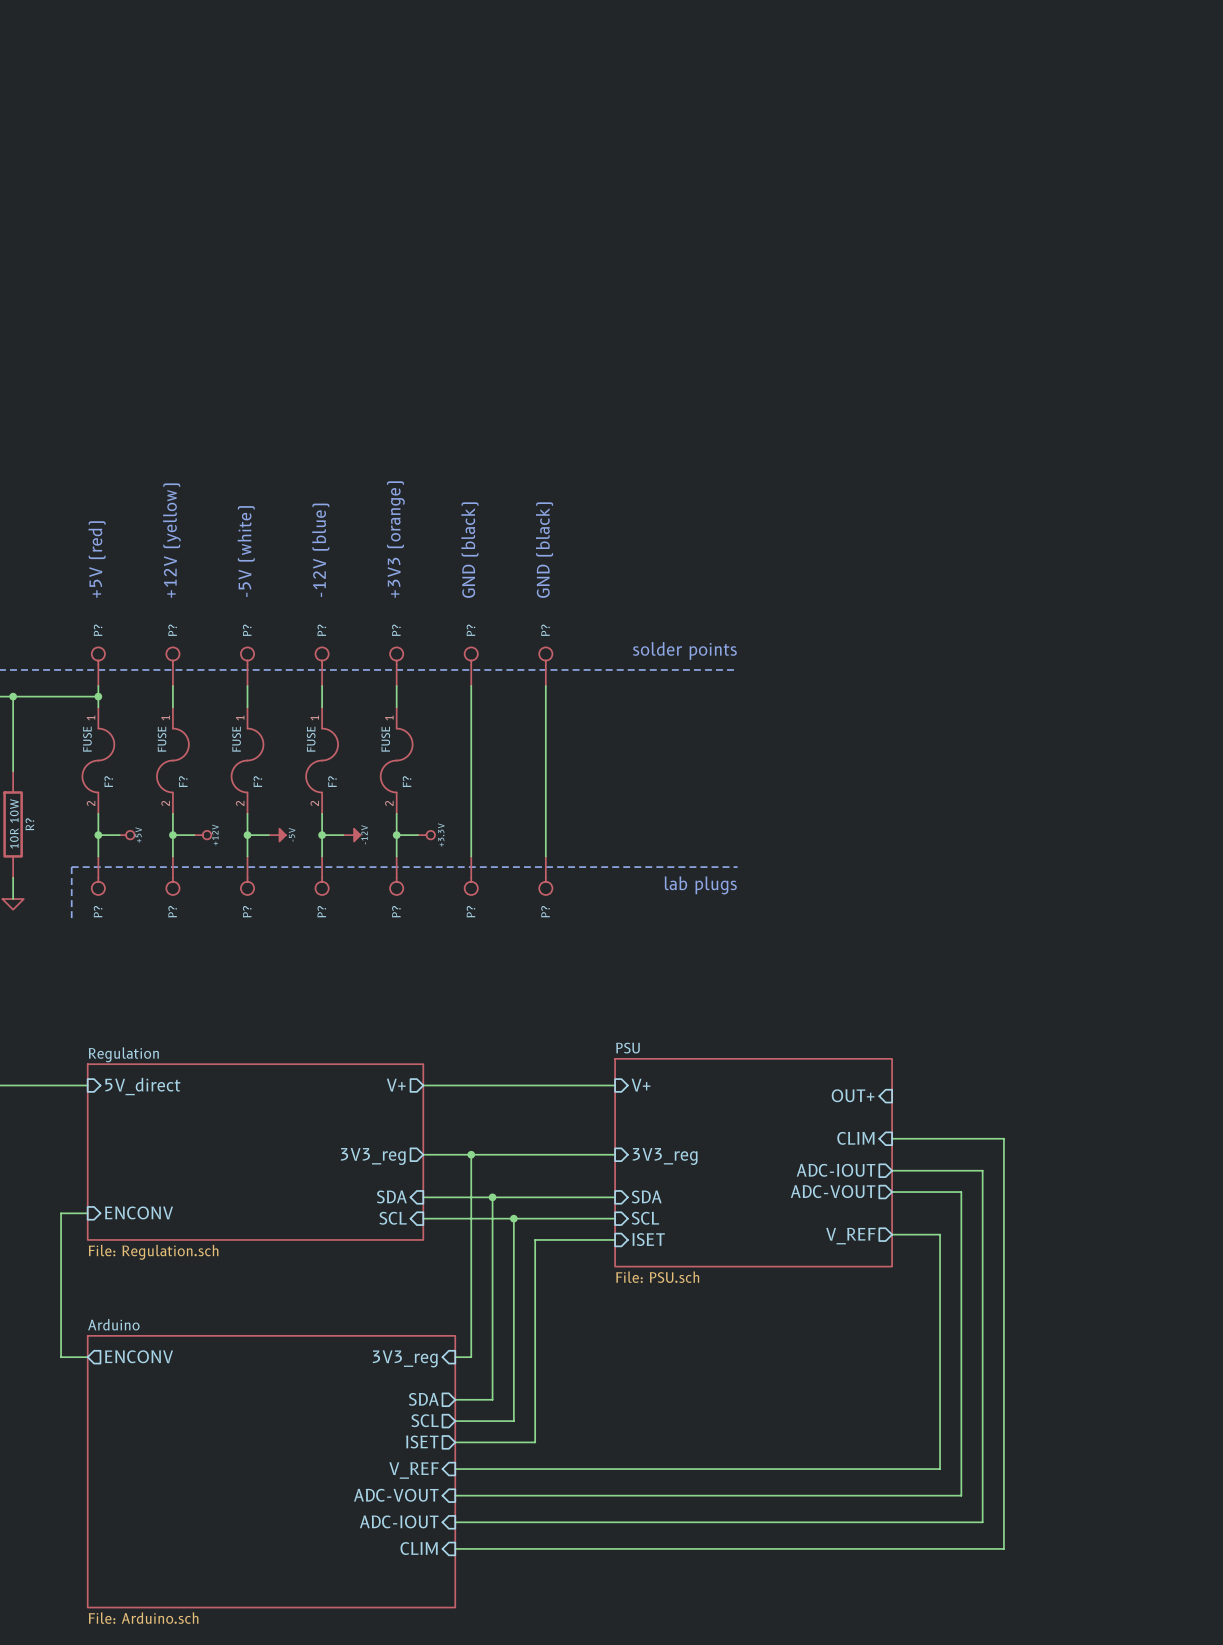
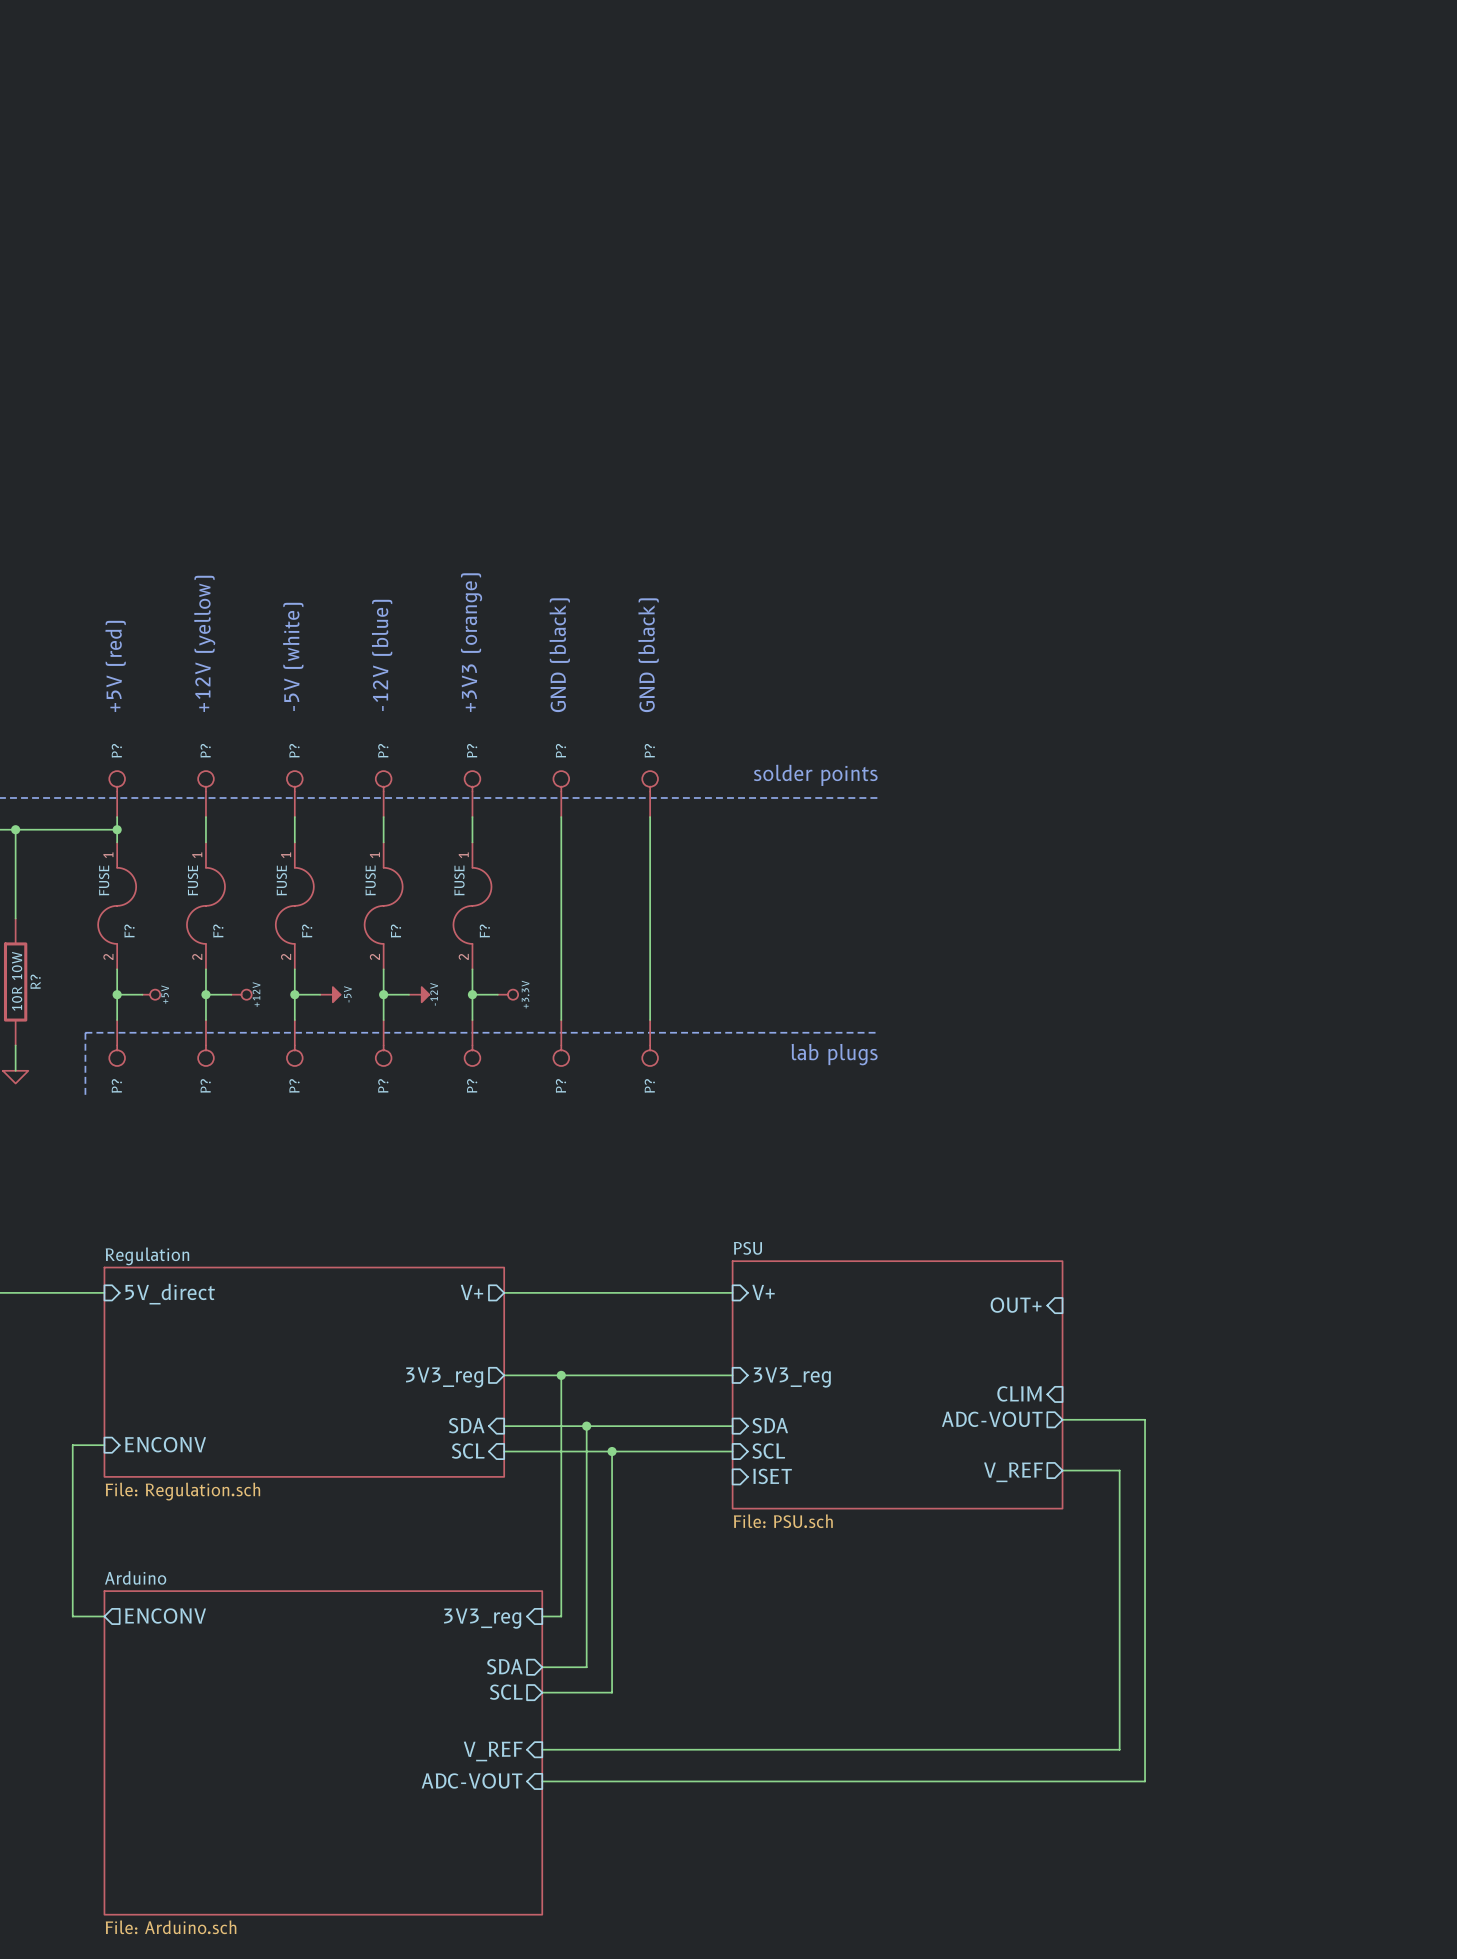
sheet pin: CLIM (855, 1138) -> none
wire: (892, 1138) (1003, 1138) (1003, 1548) (455, 1548) -> none
sheet pin shape: output (836, 1170) -> input (1019, 1393)
sheet pin: ADC-IOUT (836, 1170) -> CLIM (1019, 1393)
wire: (892, 1170) (982, 1170) (982, 1522) (455, 1522) -> none
wire: (615, 1239) (535, 1239) (535, 1442) (455, 1442) -> none
sheet pin: ISET (422, 1441) -> none
sheet pin: ADC-IOUT (399, 1521) -> none
sheet pin: CLIM (419, 1548) -> none

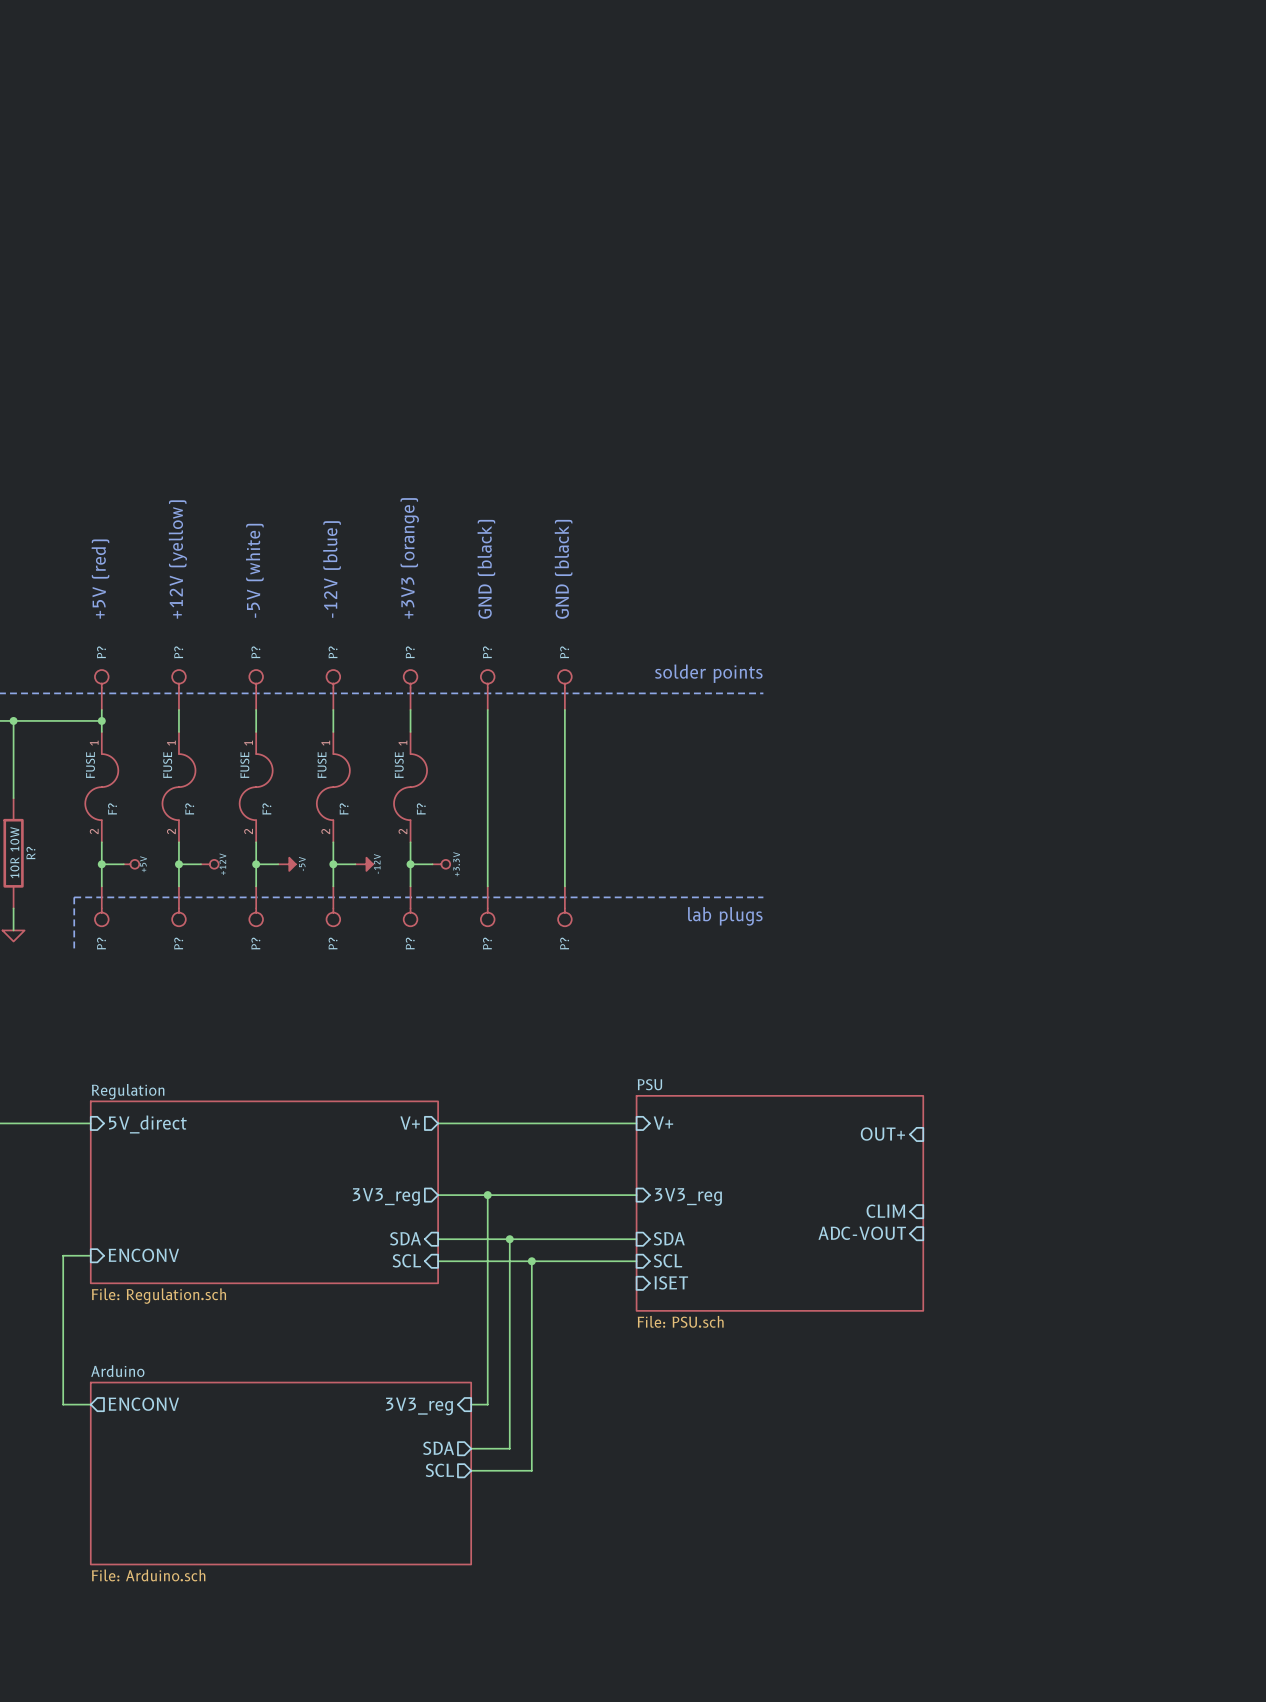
sheet pin shape: output (992, 1419) -> input (862, 1233)
wire: (1062, 1419) (1145, 1419) (1145, 1781) (542, 1781) -> none
wire: (1062, 1470) (1119, 1470) (1119, 1749) (542, 1749) -> none
sheet pin: V_REF (1013, 1472) -> none
sheet Arduino: none -> File: Arduino.sch (280, 1473)
sheet pin: V_REF (493, 1751) -> none
sheet Arduino: File: Arduino.sch (323, 1752) -> none
sheet pin: ADC-VOUT (472, 1780) -> none

